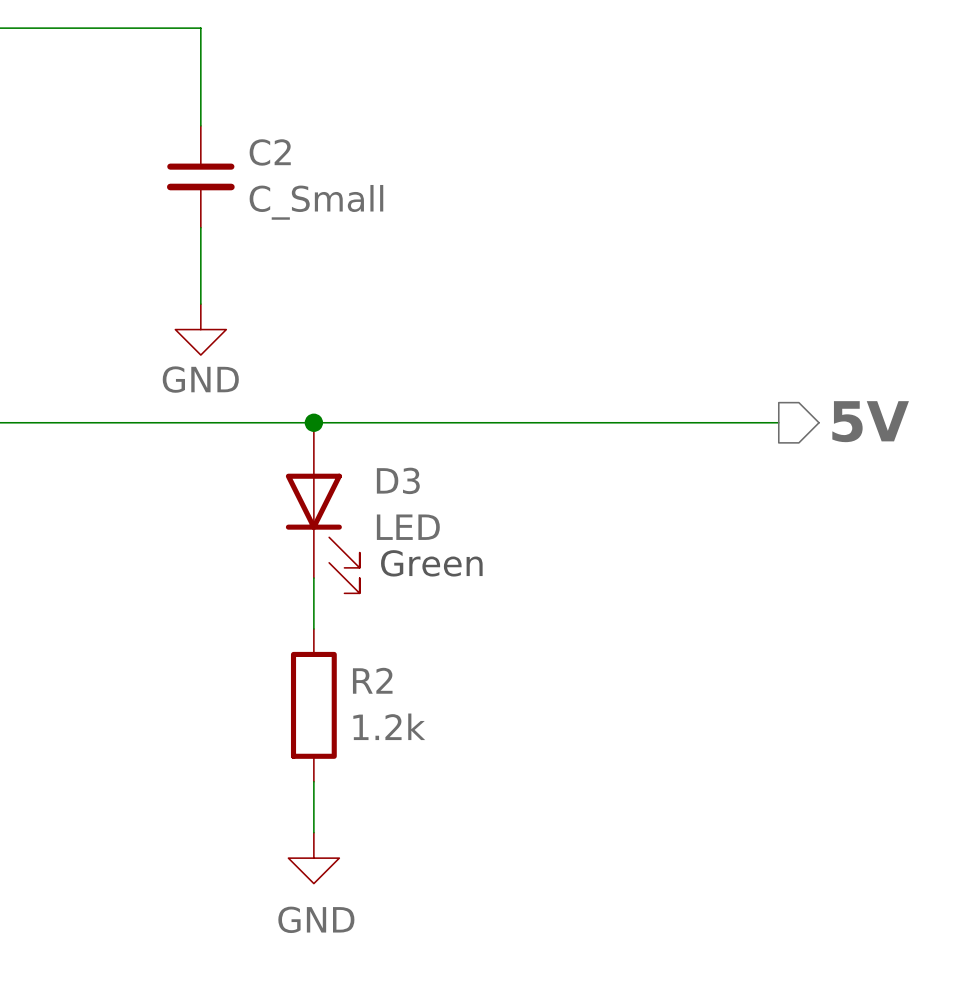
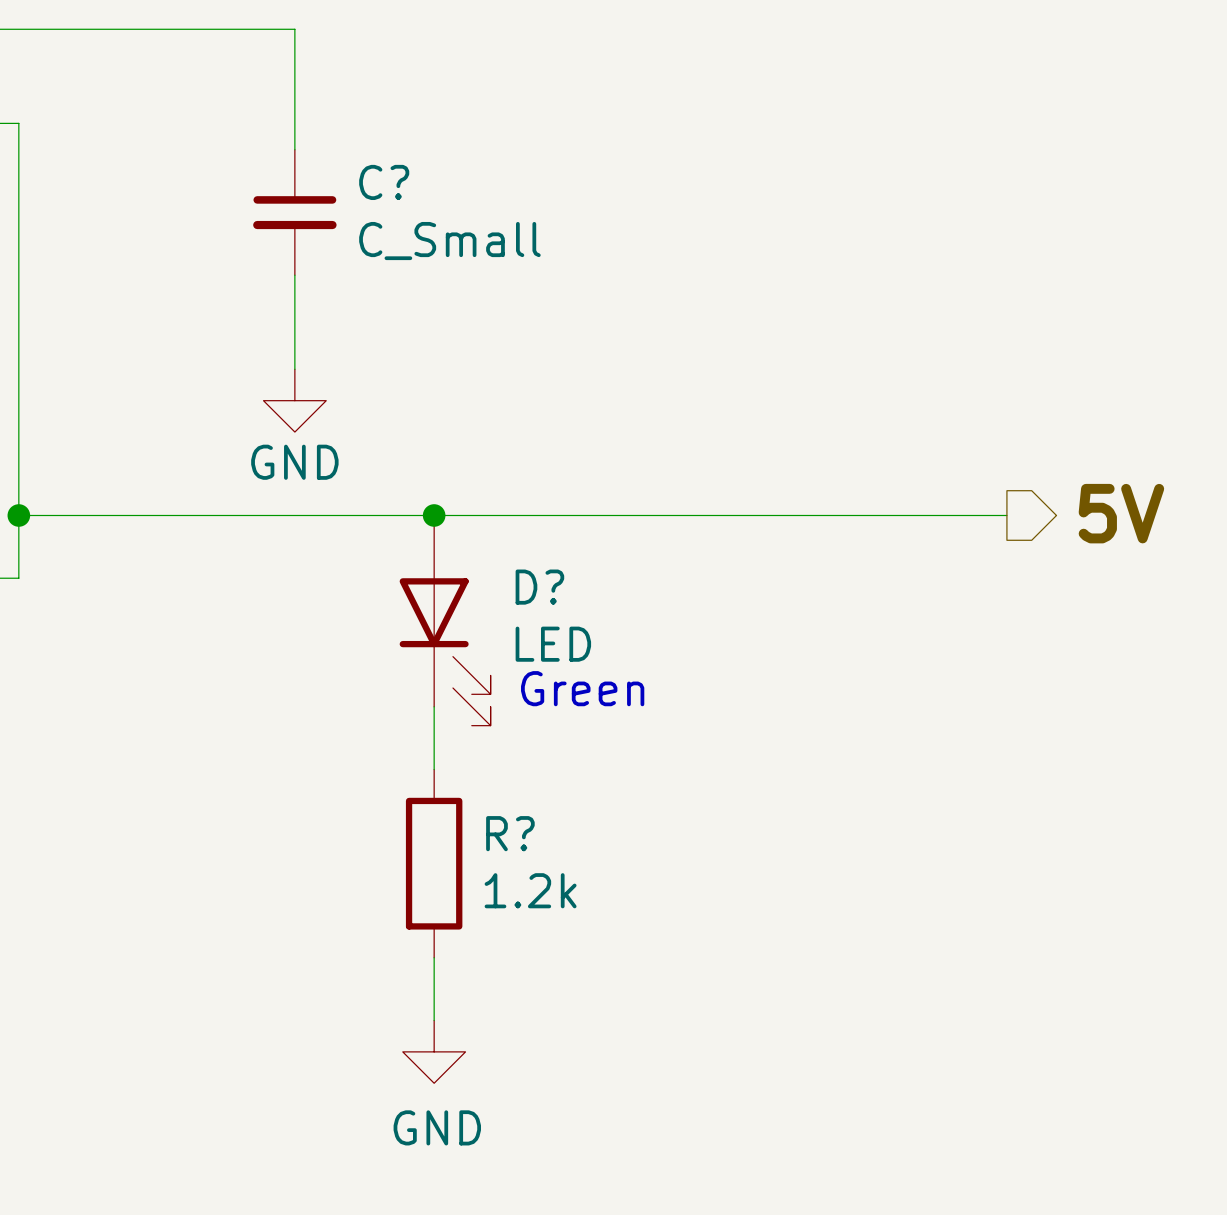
C2 name: C2 (270, 152) -> C? (384, 182)
D3 name: D3 (398, 480) -> D? (539, 587)
R2 name: R2 (372, 680) -> R? (510, 833)

